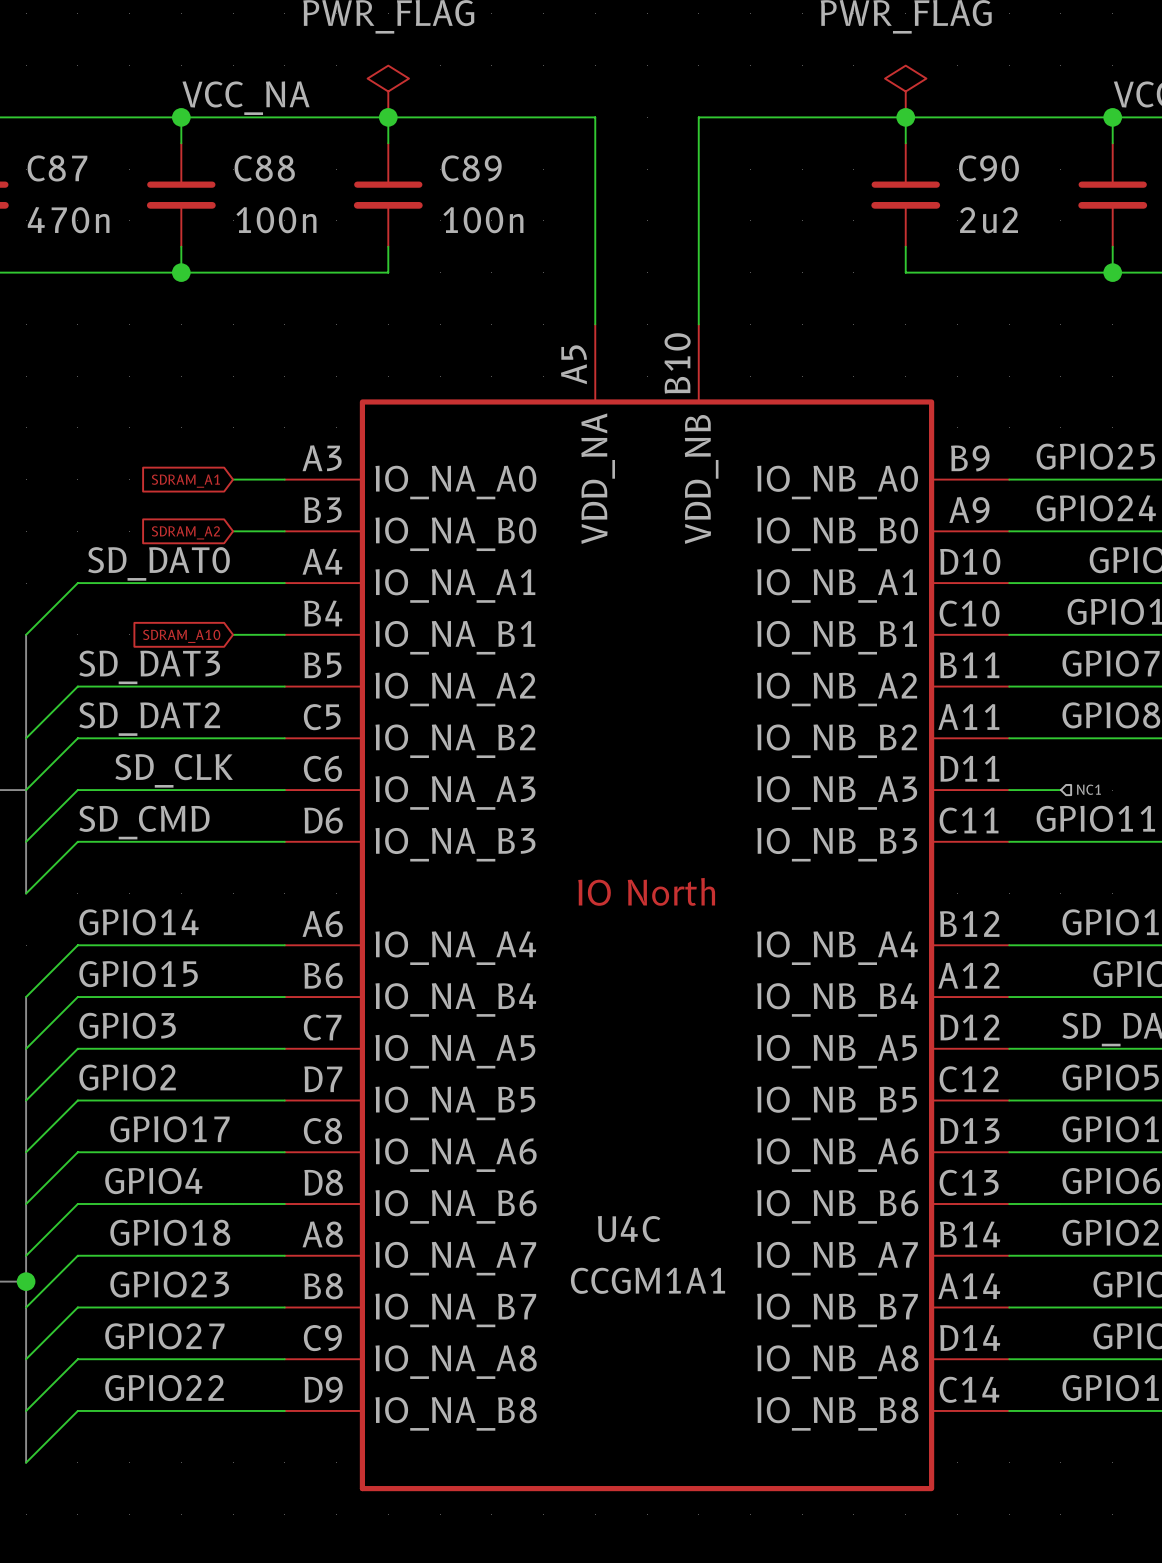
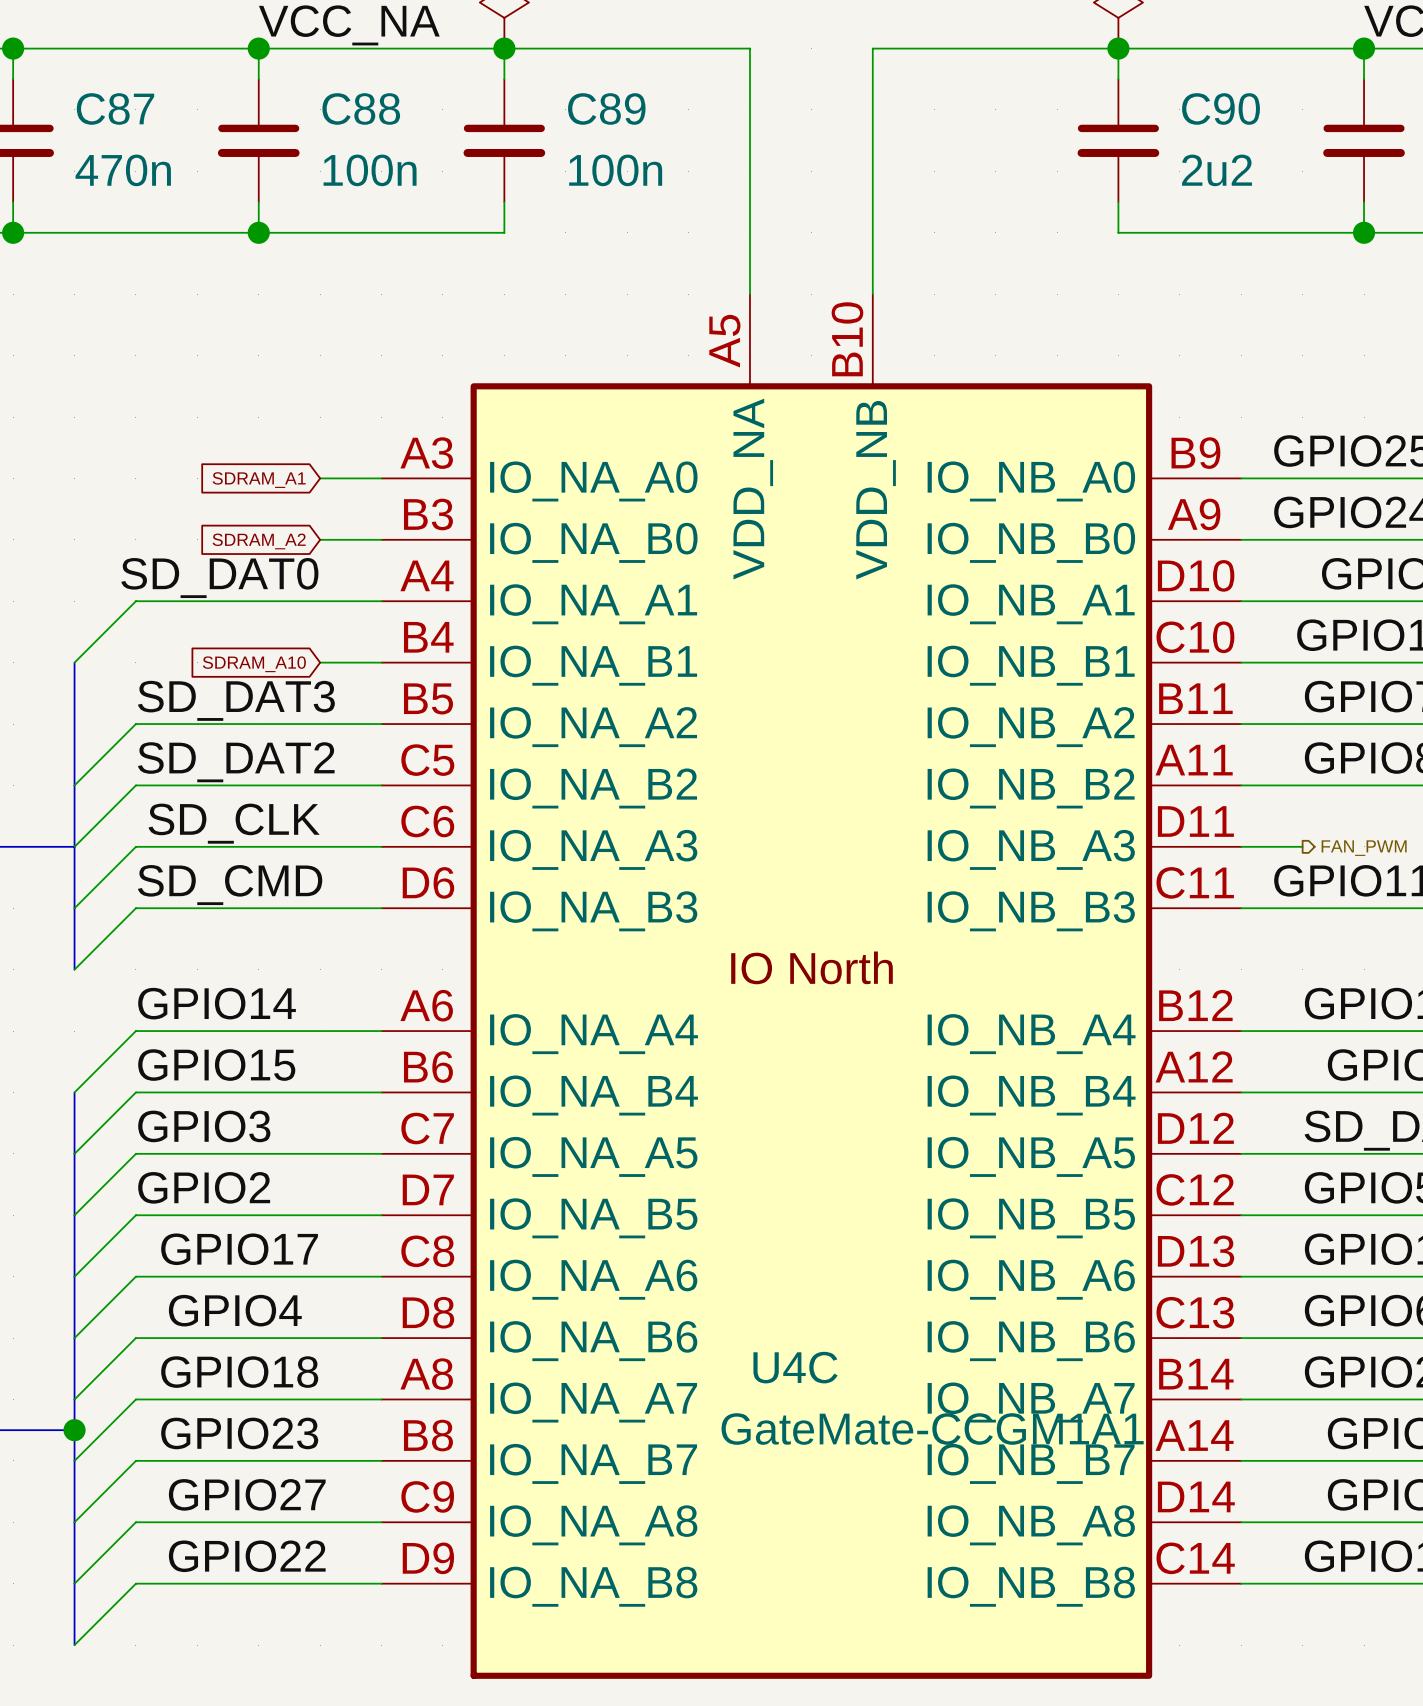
hierarchical label shape: input (1088, 789) -> output (1364, 848)
hierarchical label: NC1 (1088, 789) -> FAN_PWM (1364, 848)
U4C value: CCGM1A1 (648, 1280) -> GateMate-CCGM1A1 (932, 1429)

